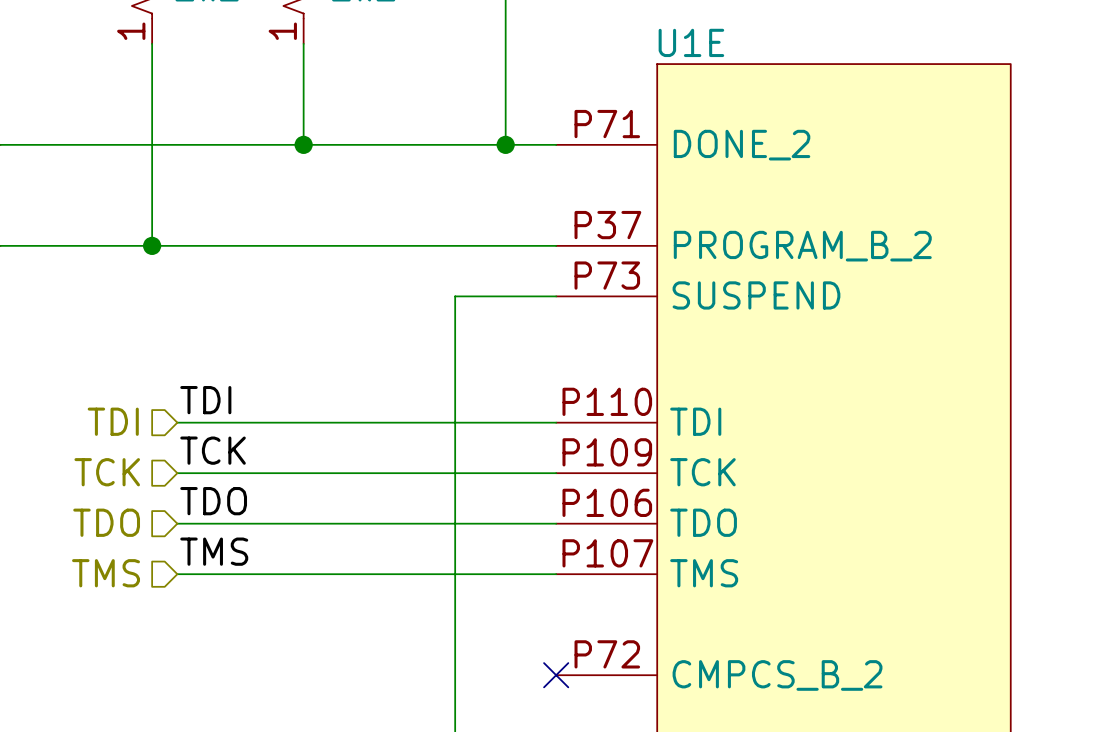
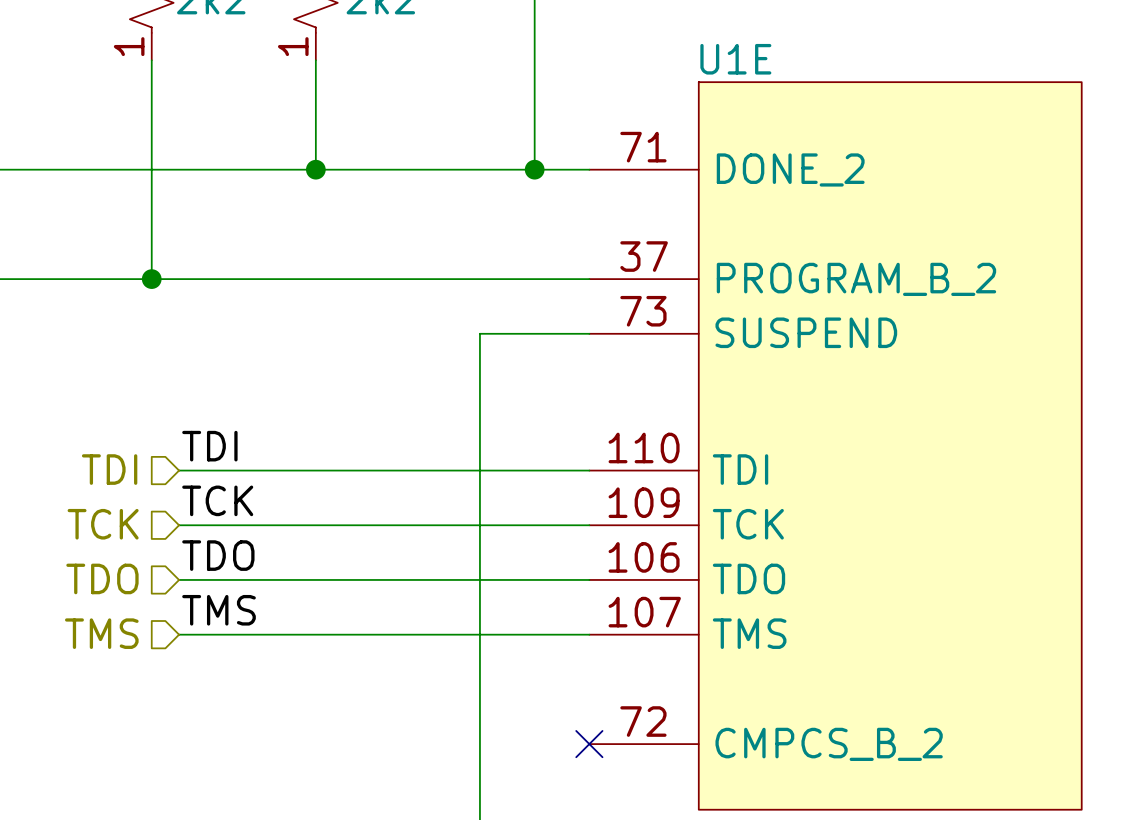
U1E pin number: P71 (607, 124) -> 71 (643, 147)
U1E pin number: P37 (607, 225) -> 37 (644, 256)
U1E pin number: P73 (607, 275) -> 73 (643, 311)
U1E pin number: P110 (607, 401) -> 110 (644, 448)
U1E pin number: P109 (607, 452) -> 109 (644, 502)
U1E pin number: P106 (607, 502) -> 106 (644, 557)
U1E pin number: P107 (607, 553) -> 107 (644, 612)
U1E pin number: P72 (607, 654) -> 72 (643, 721)

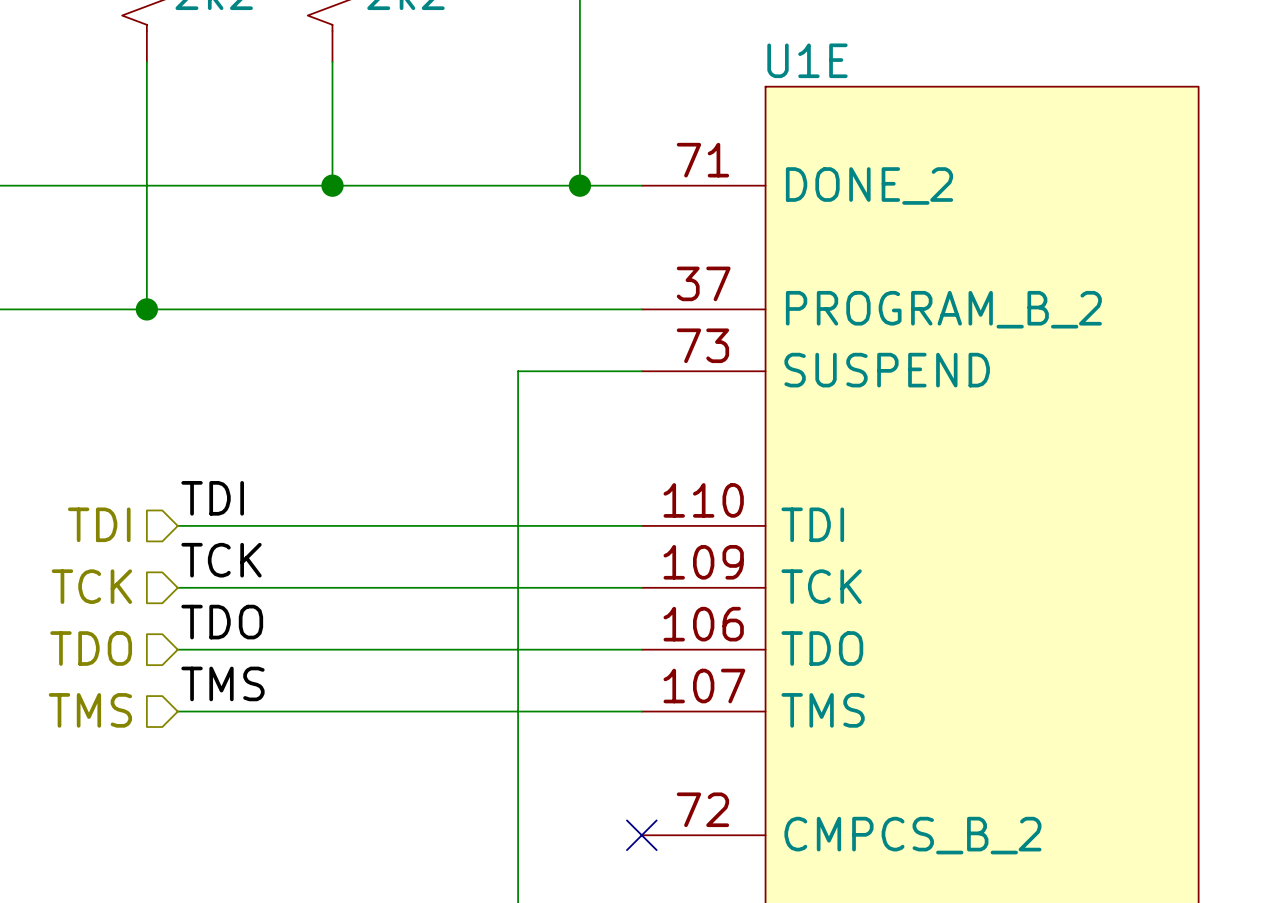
part pin number: 1 (129, 46) -> none
part pin number: 1 (293, 46) -> none

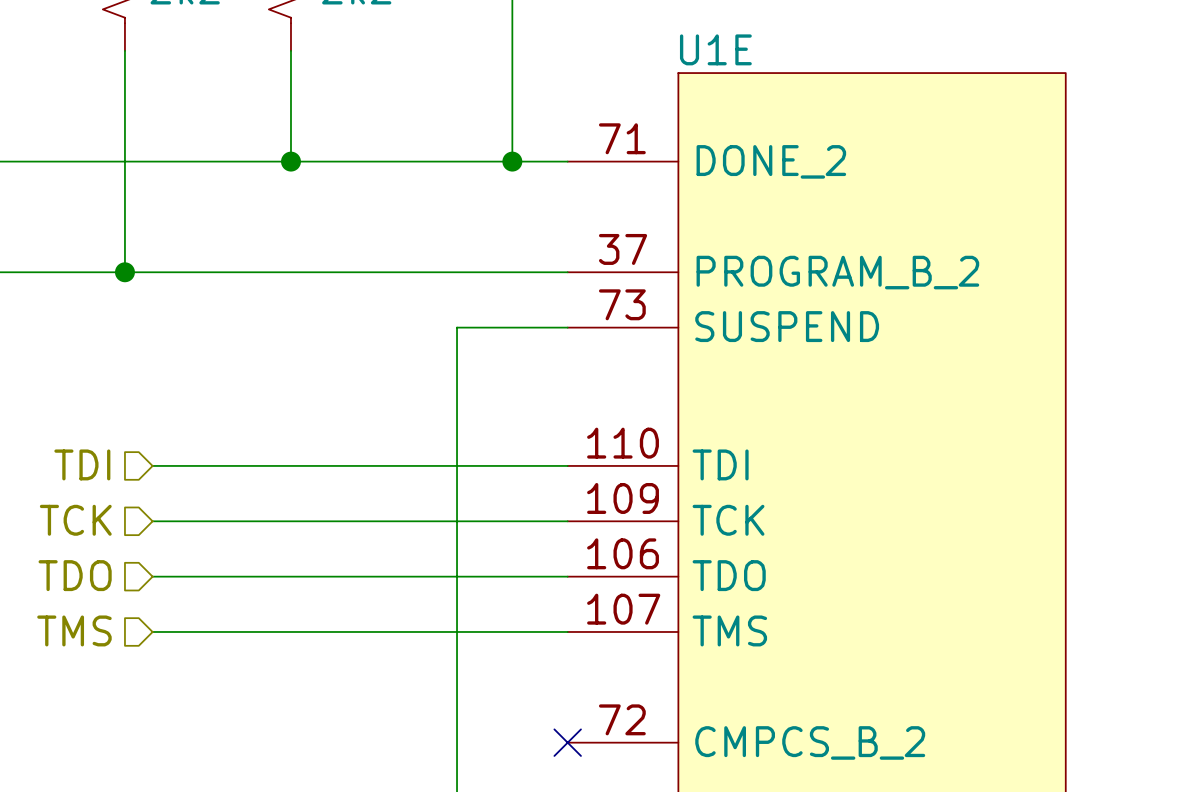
label: TDI (212, 498) -> none
label: TCK (221, 560) -> none
label: TDO (222, 622) -> none
label: TMS (222, 683) -> none

